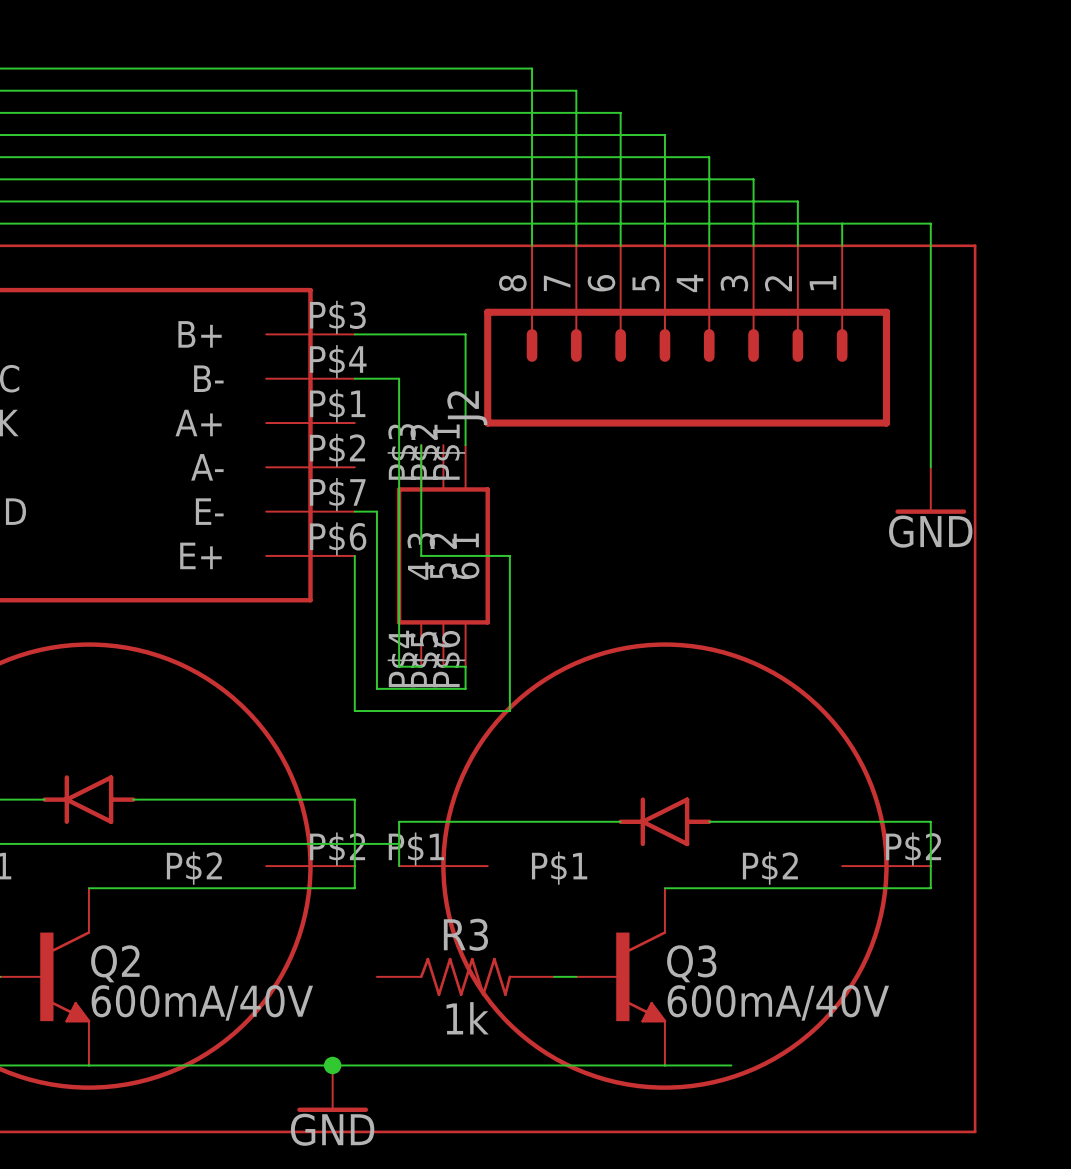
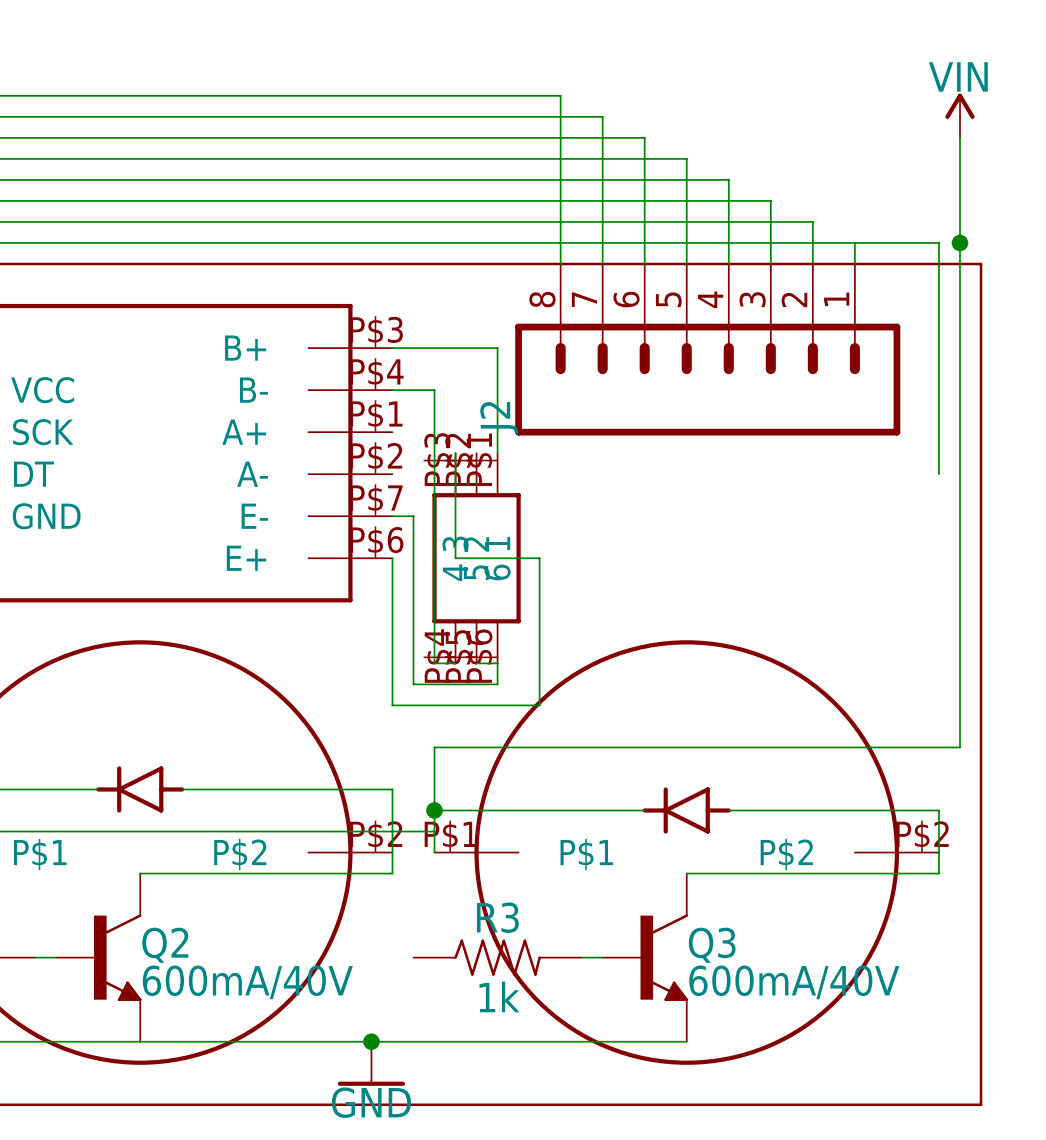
power symbol: none -> VIN (960, 115)
wire: none -> (960, 137) (960, 747) (434, 747) (434, 810)
junction: none -> (960, 242)
power symbol: GND (930, 490) -> none
junction: none -> (434, 810)
wire: (664, 1065) (731, 1065) -> none

